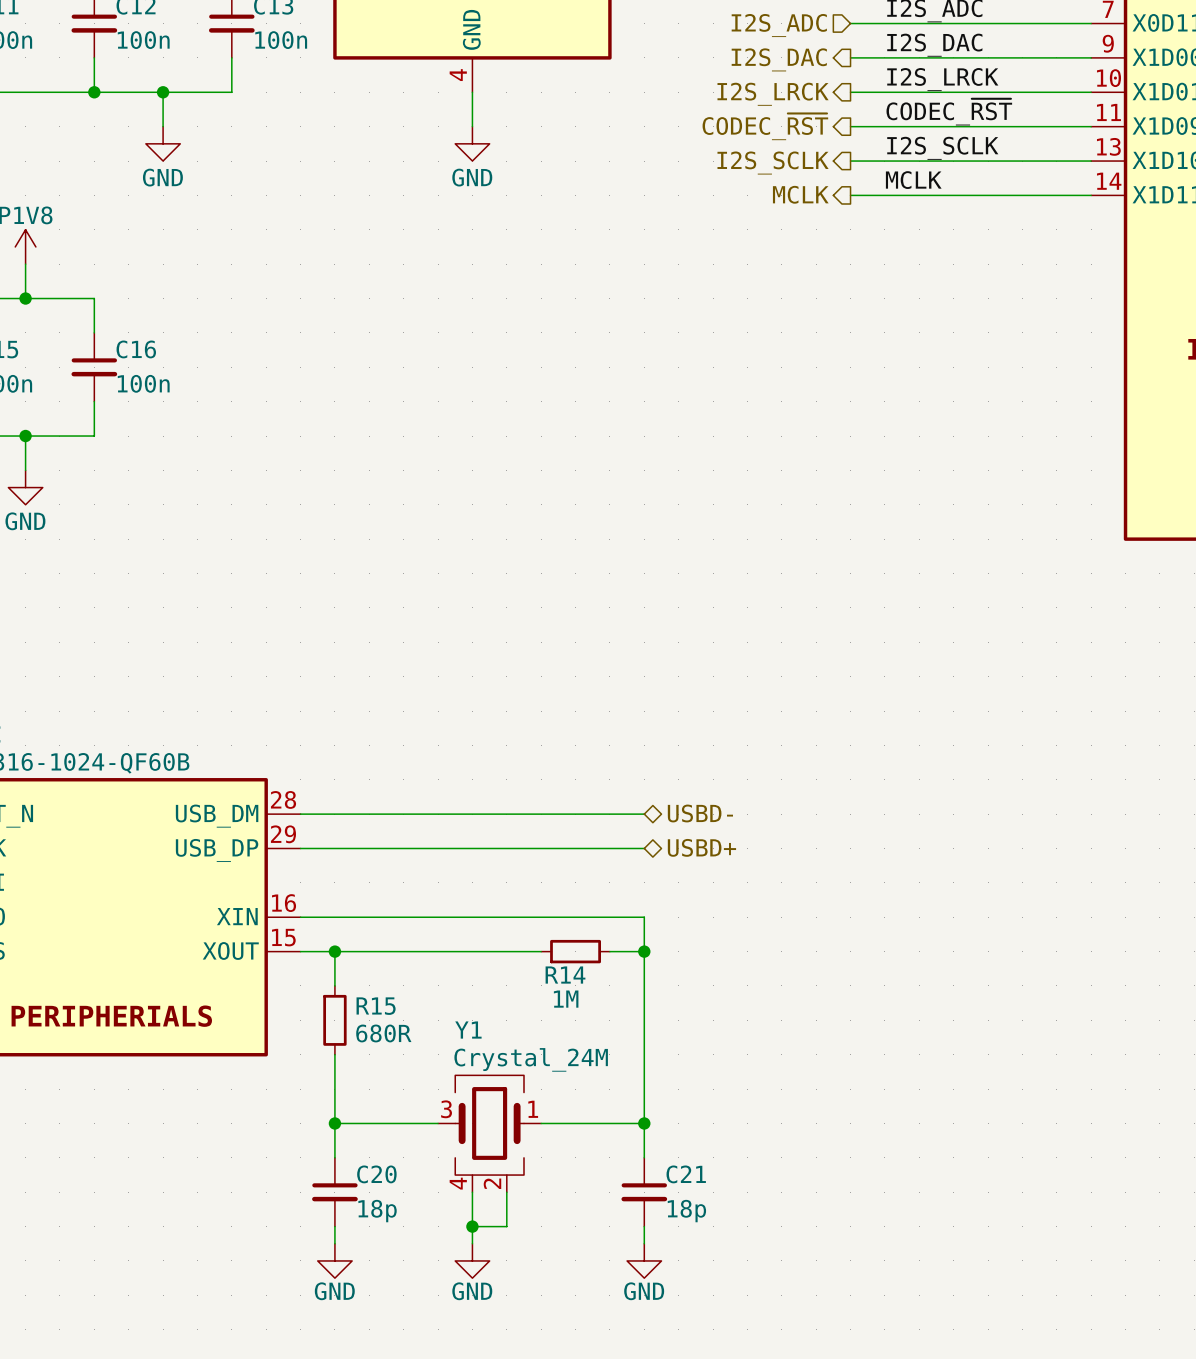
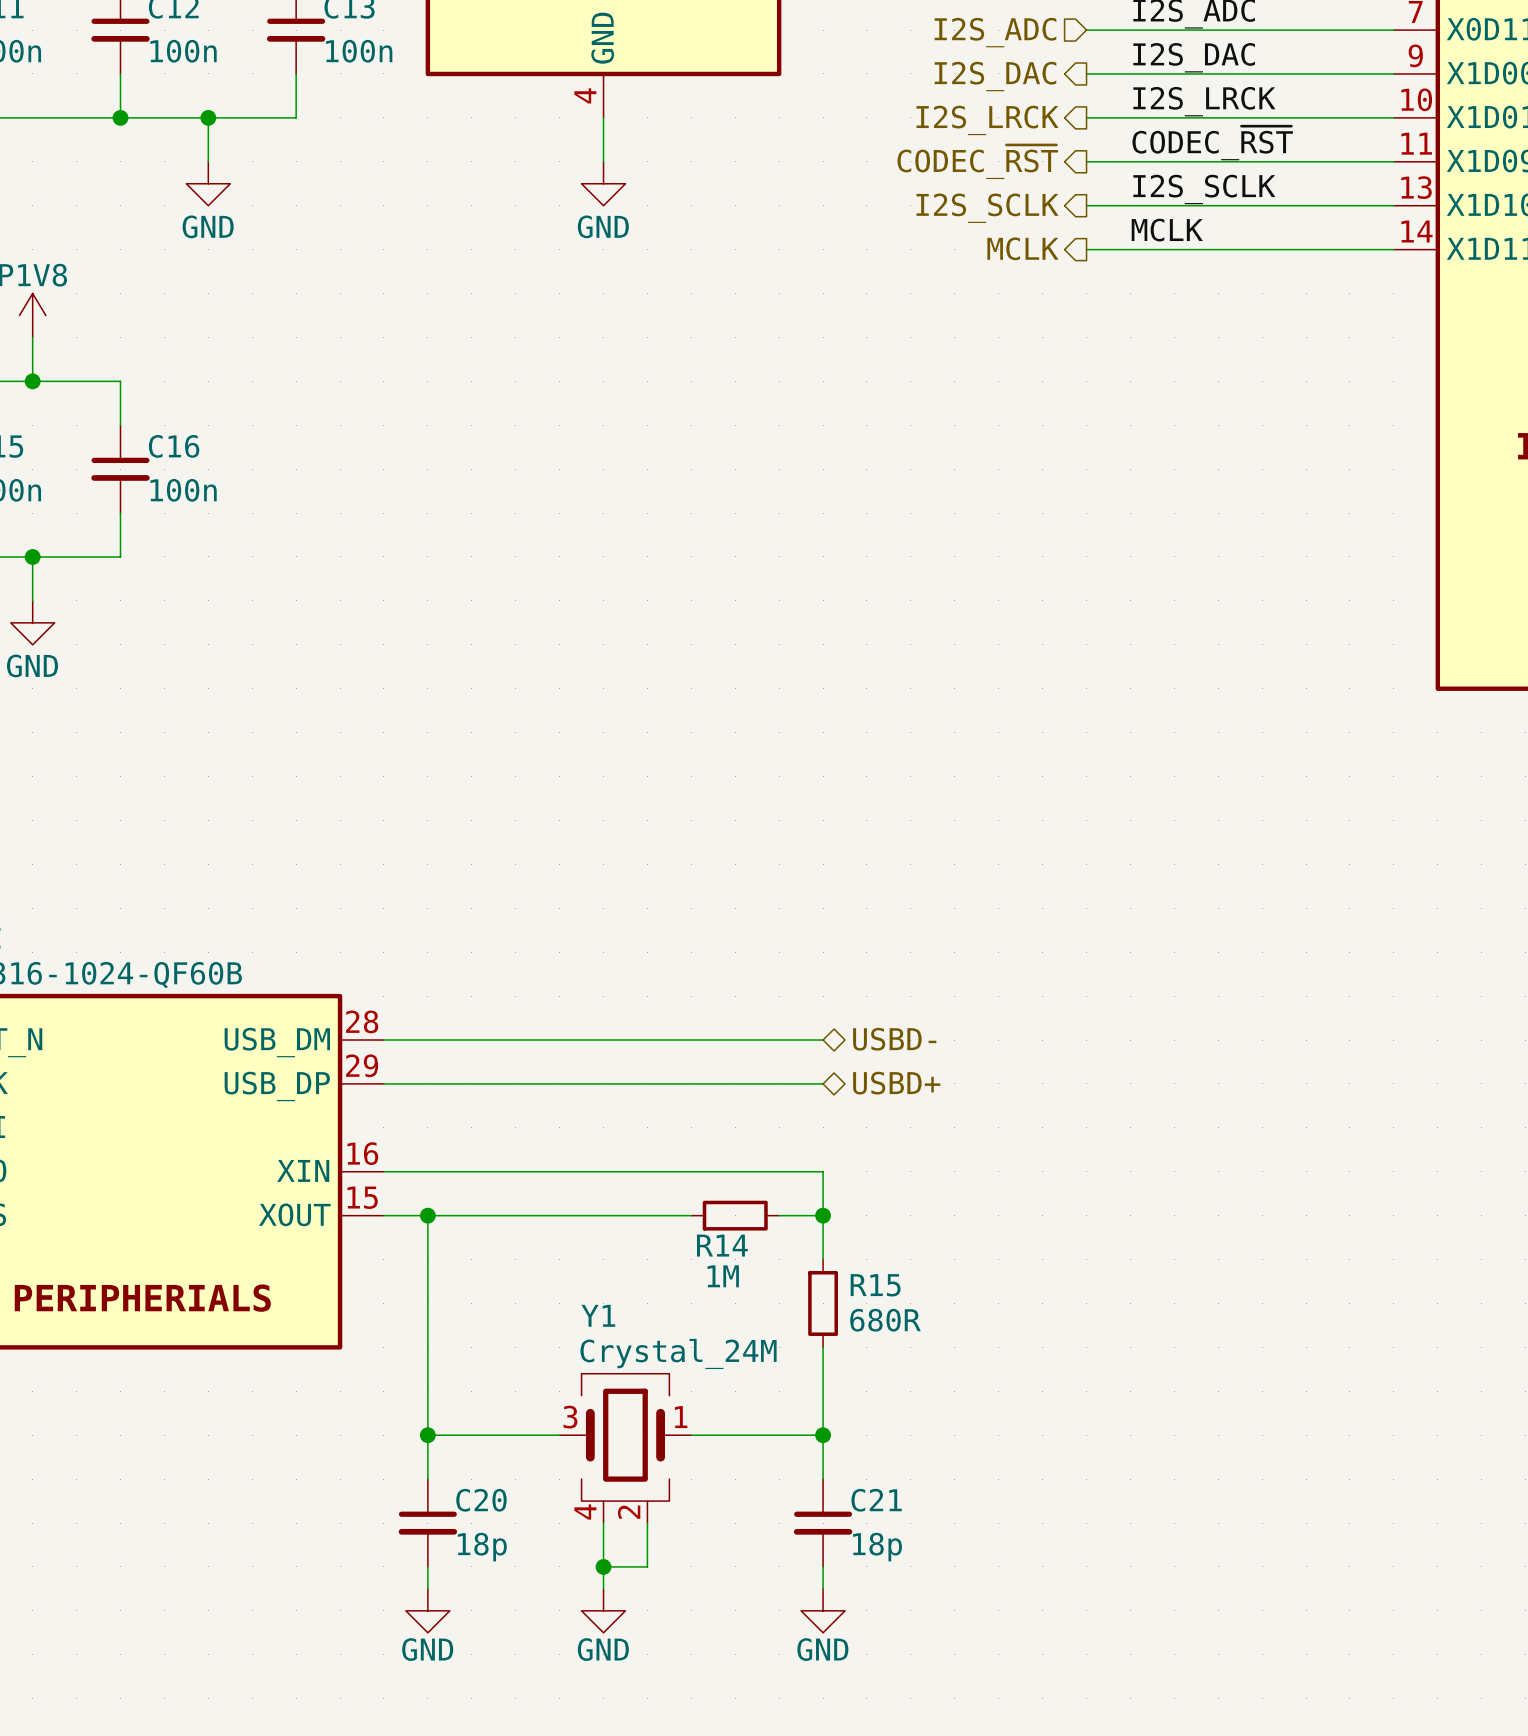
wire: (644, 985) (644, 1054) -> (427, 1259) (427, 1347)
R15 position: (334, 1020) -> (823, 1303)

